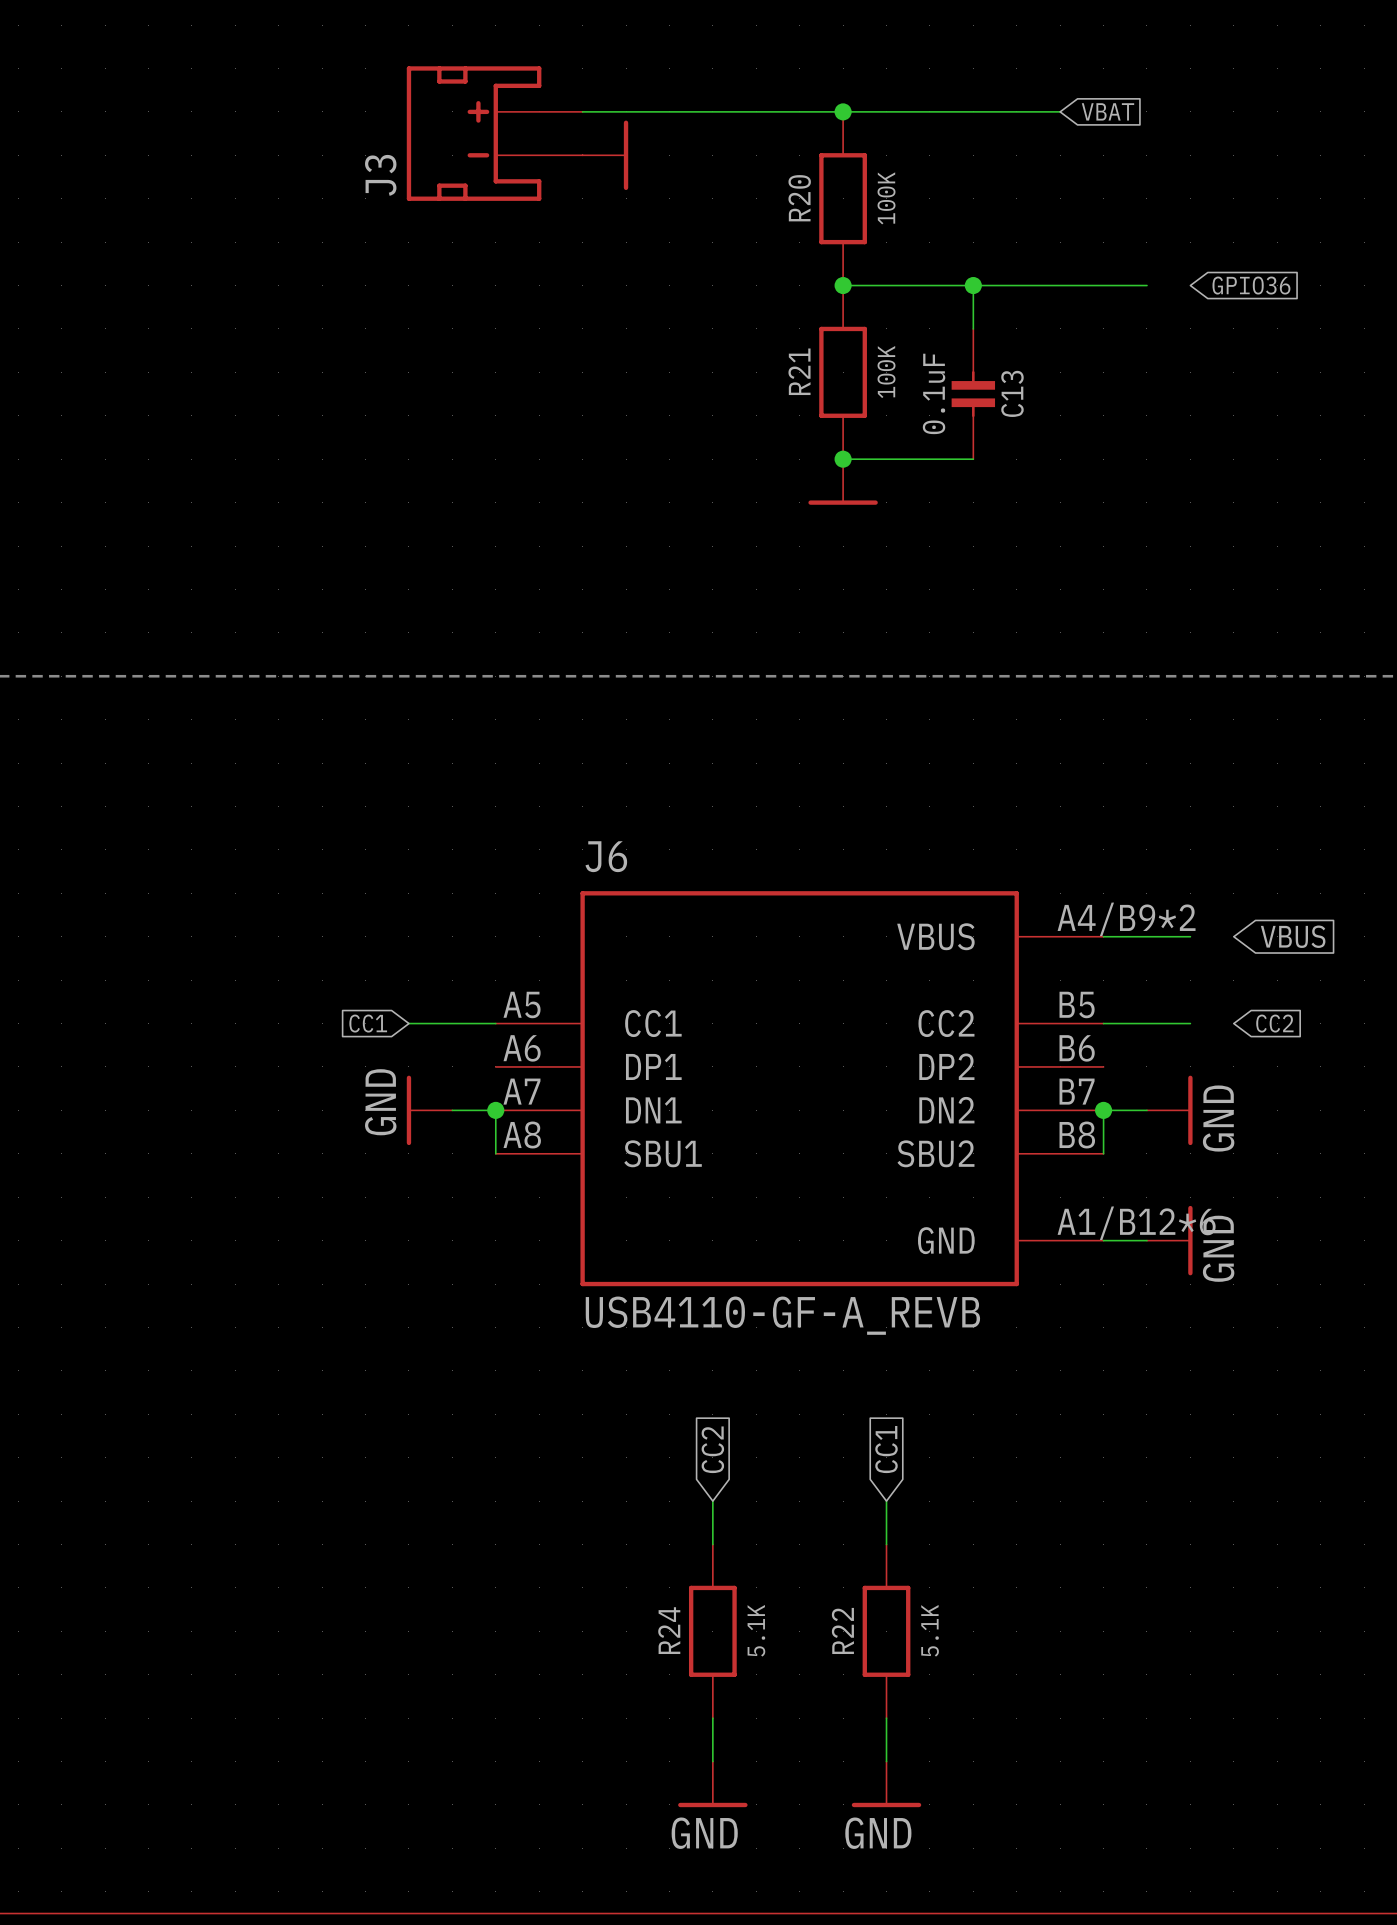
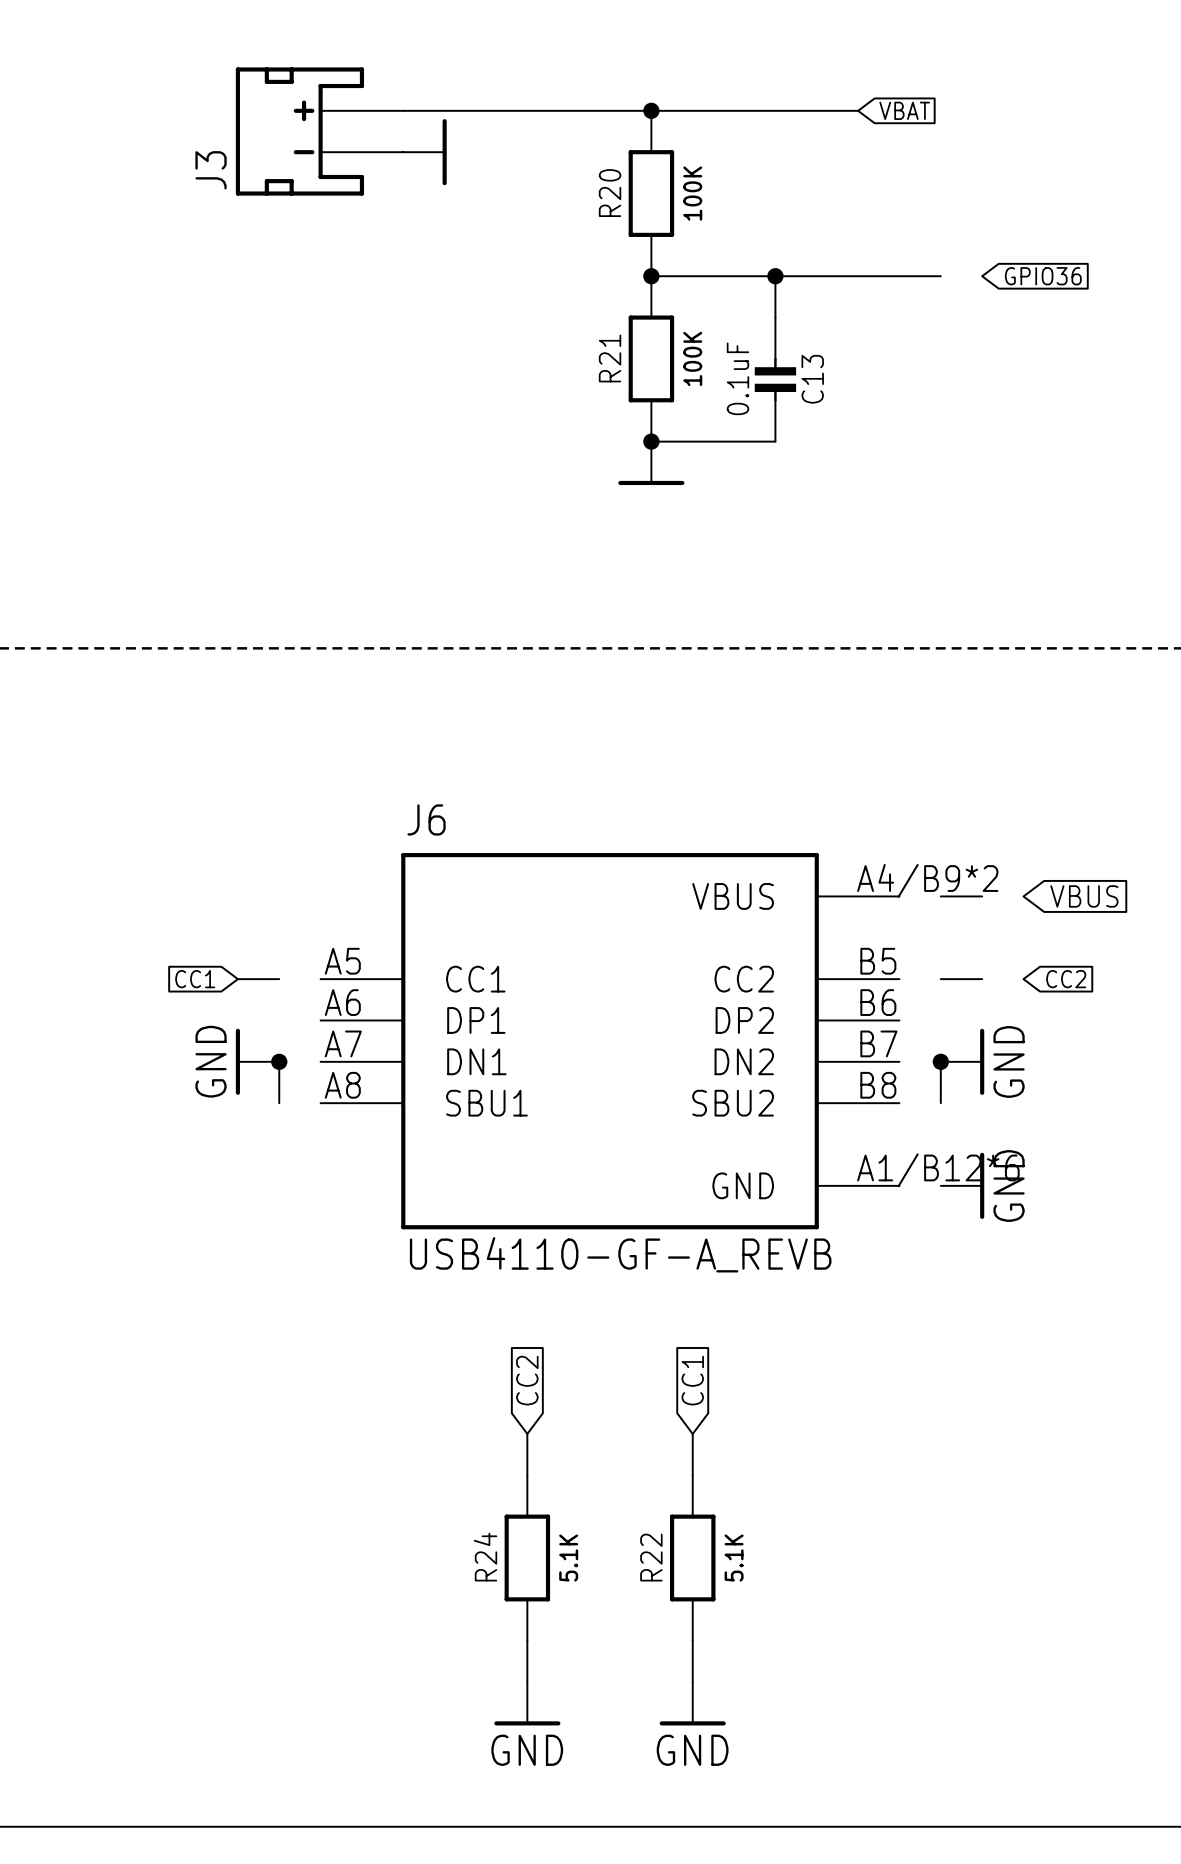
wire: (1103, 936) (1146, 936) -> none
wire: (452, 1023) (495, 1023) -> none
wire: (1103, 1023) (1146, 1023) -> none
wire: (452, 1110) (495, 1110) (495, 1153) -> (279, 1061) (279, 1103)
junction position: (495, 1110) -> (279, 1061)
junction position: (1103, 1110) -> (940, 1061)
wire: (1146, 1110) (1103, 1110) (1103, 1153) -> (940, 1061) (940, 1103)
wire: (1103, 1240) (1146, 1240) -> none

